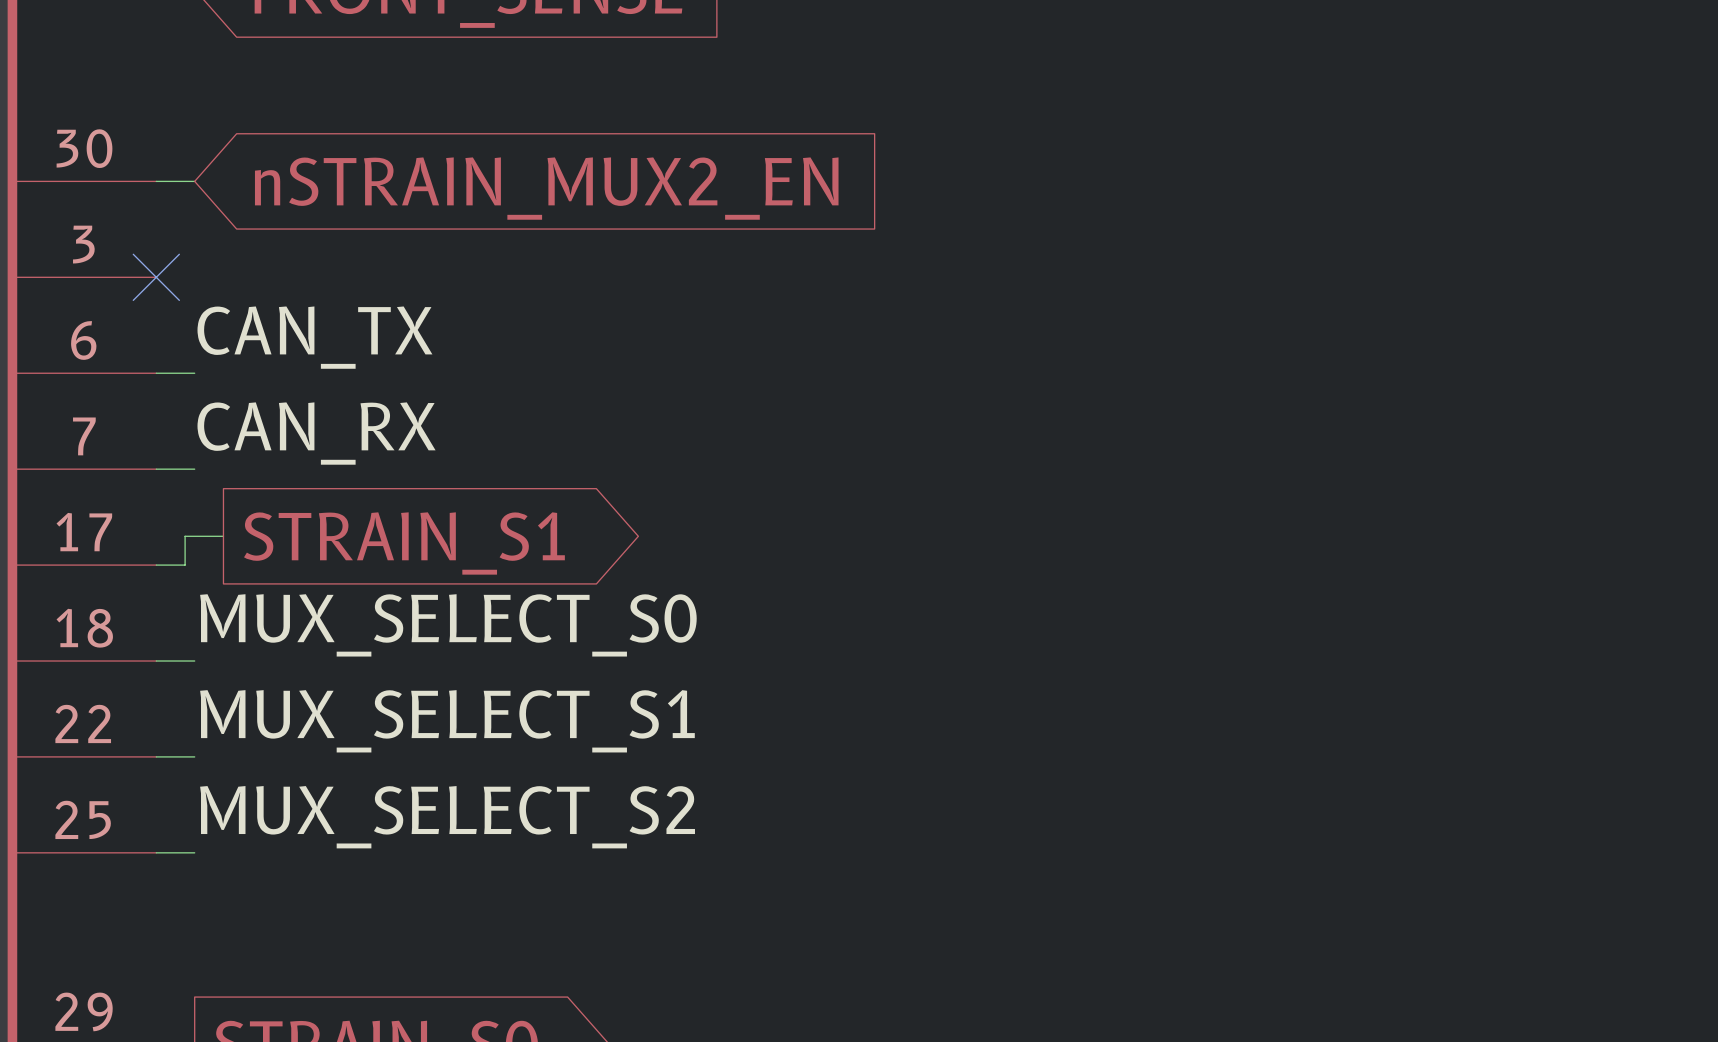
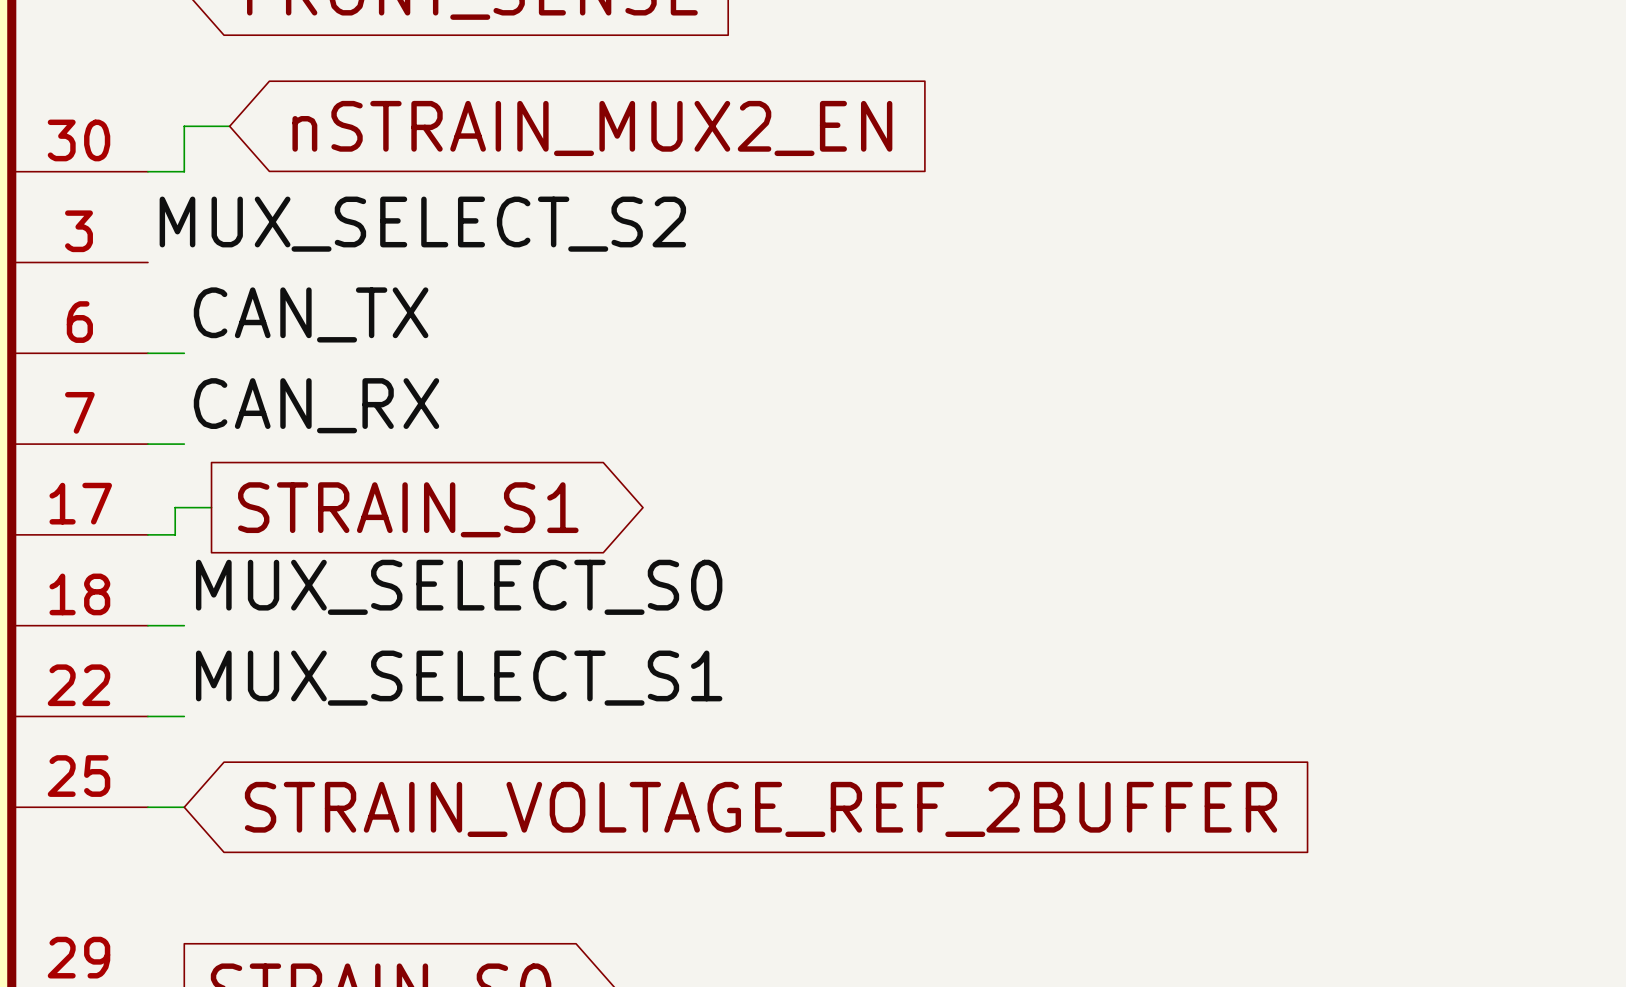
wire: none -> (229, 126) (184, 126) (184, 171)
global label position: nSTRAIN_MUX2_EN (546, 188) -> nSTRAIN_MUX2_EN (592, 128)
no-connect mark: (156, 277) -> none
label position: MUX_SELECT_S2 (447, 817) -> MUX_SELECT_S2 (422, 224)
global label: none -> STRAIN_VOLTAGE_REF_2BUFFER (761, 809)

